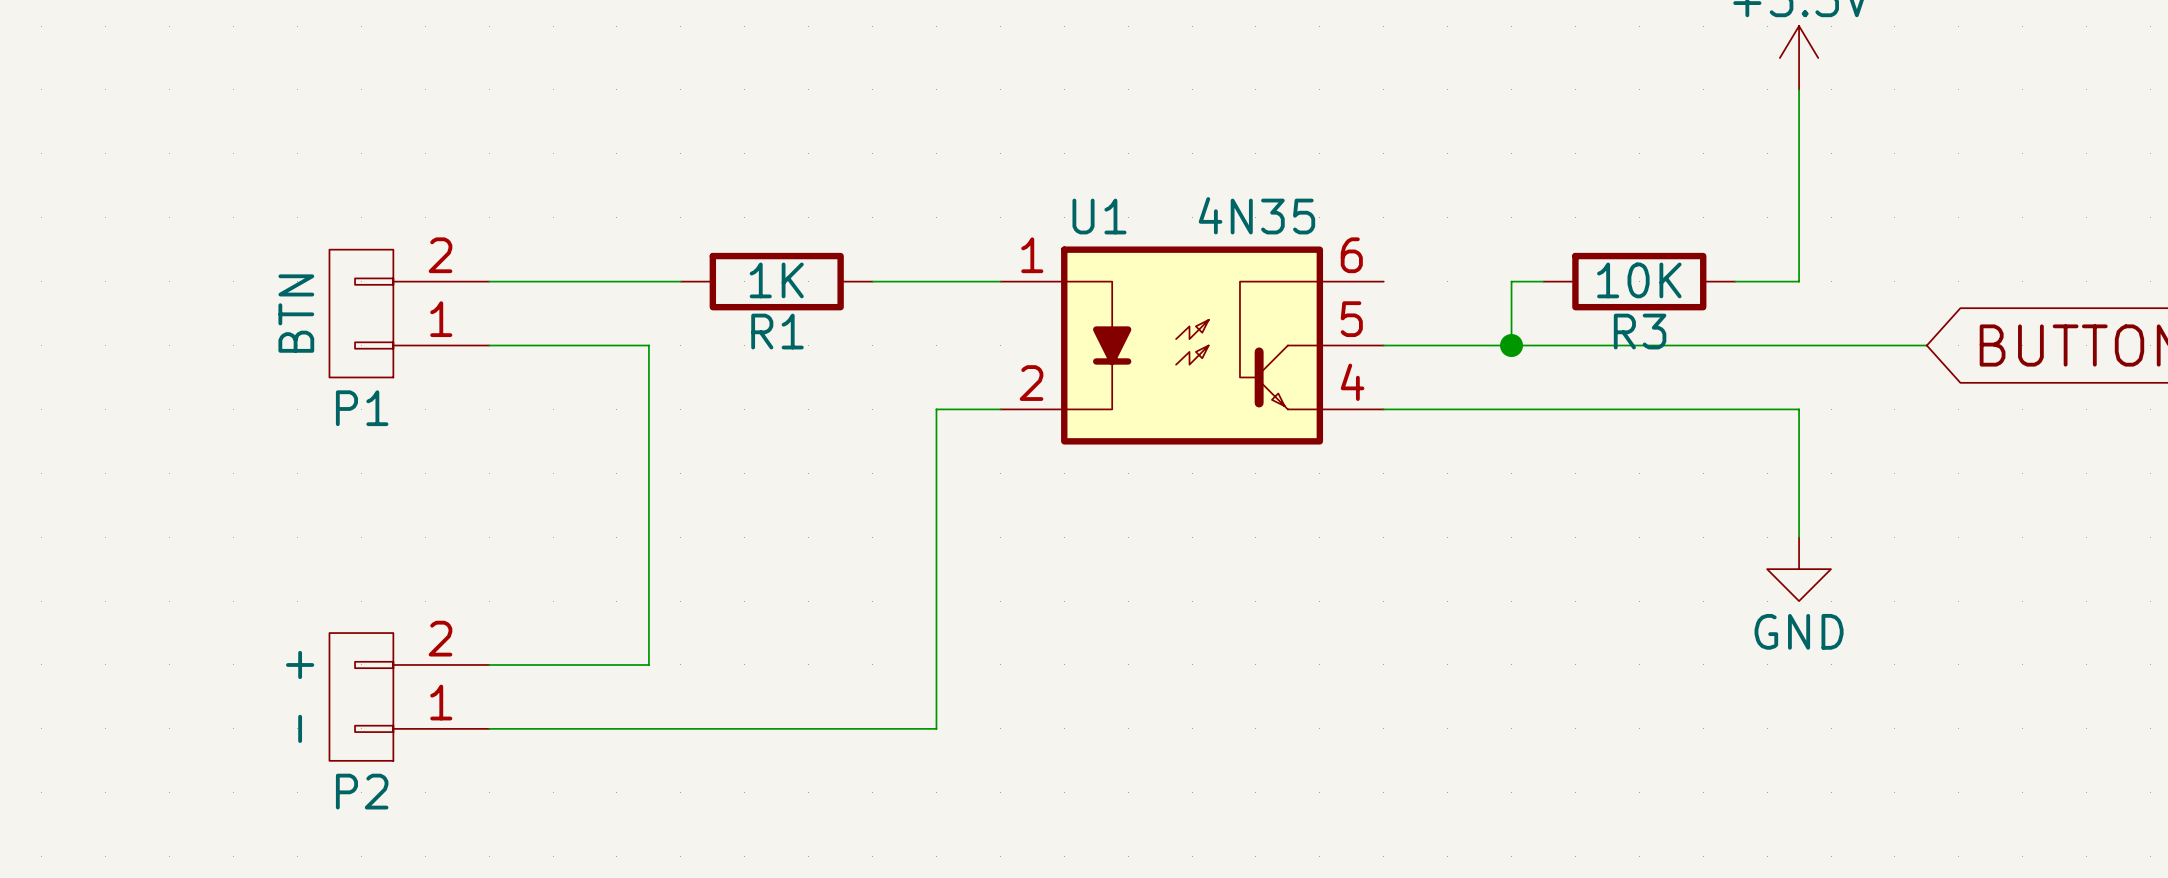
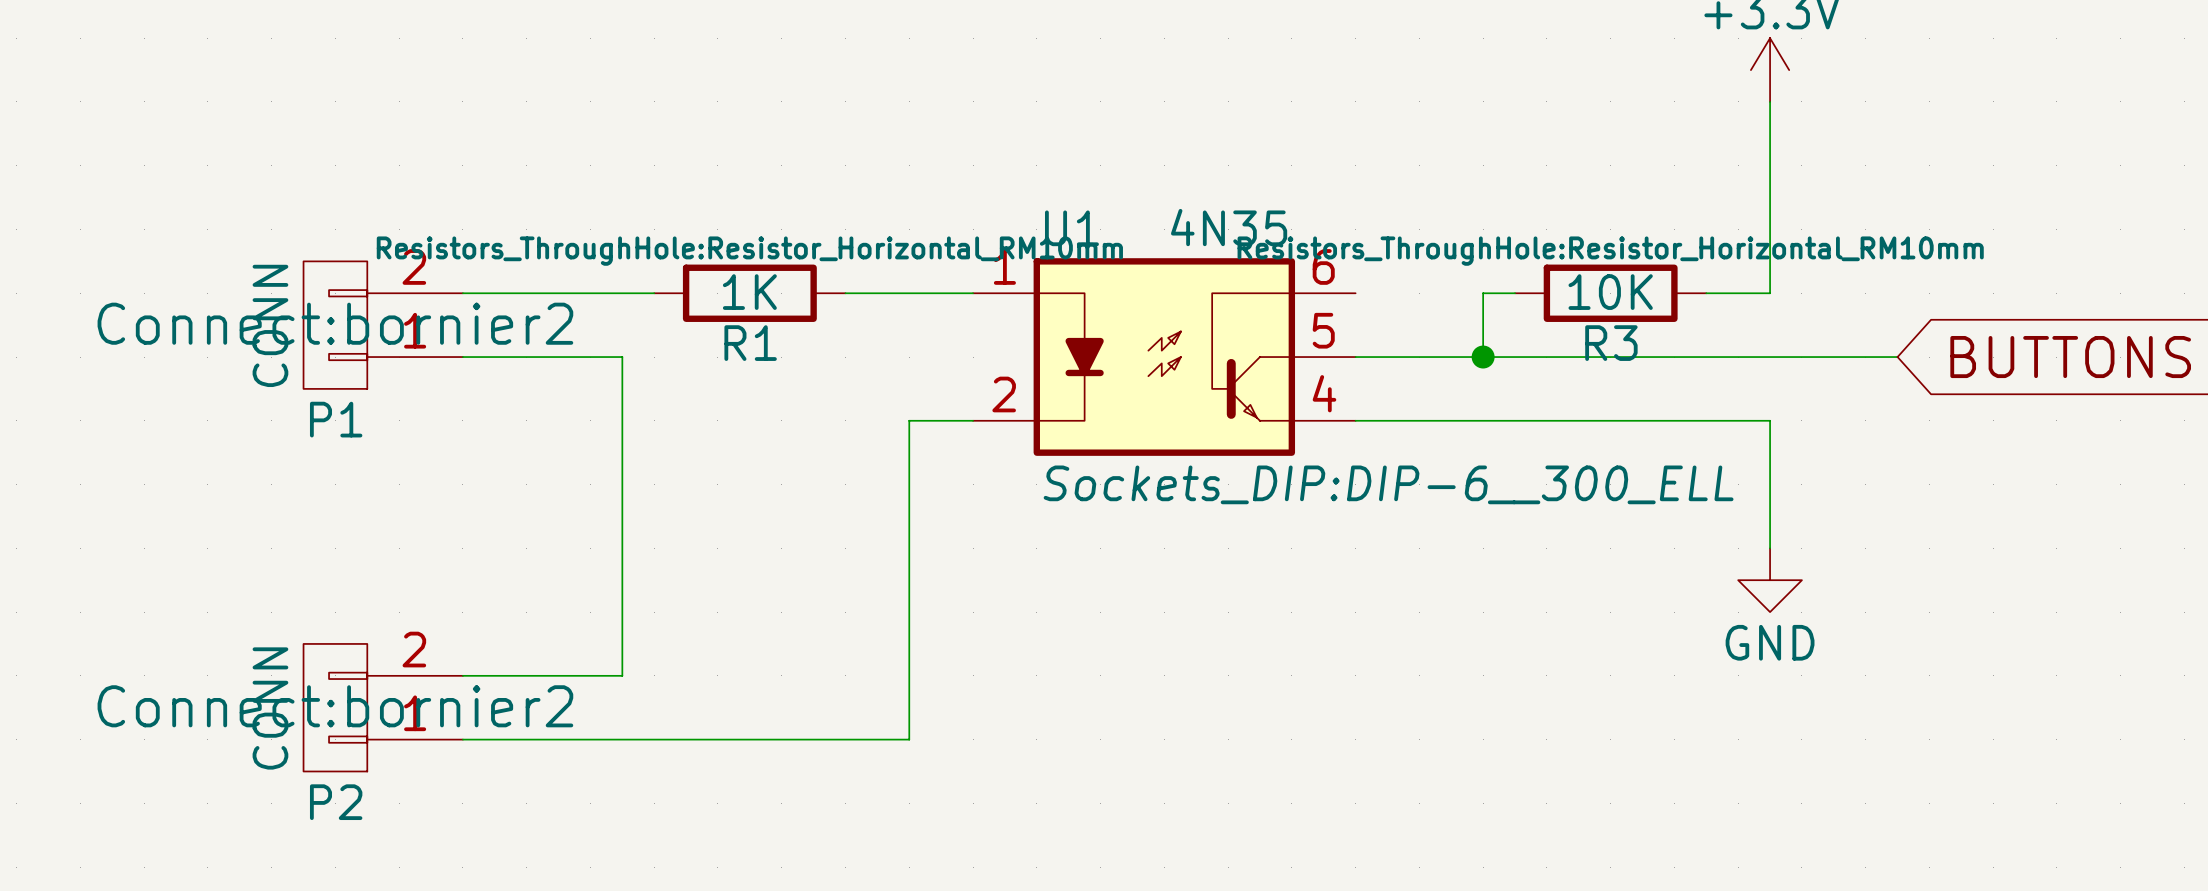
R1 text: none -> Resistors_ThroughHole:Resistor_Horizontal_RM10mm (749, 251)
R3 text: none -> Resistors_ThroughHole:Resistor_Horizontal_RM10mm (1610, 251)
P1 text: none -> Connect:bornier2 (335, 323)
P1 value: BTN (296, 313) -> CONN (270, 325)
U1 text: none -> Sockets_DIP:DIP-6__300_ELL (1388, 484)
P2 text: none -> Connect:bornier2 (335, 706)
P2 value: - + (300, 696) -> CONN (270, 708)

